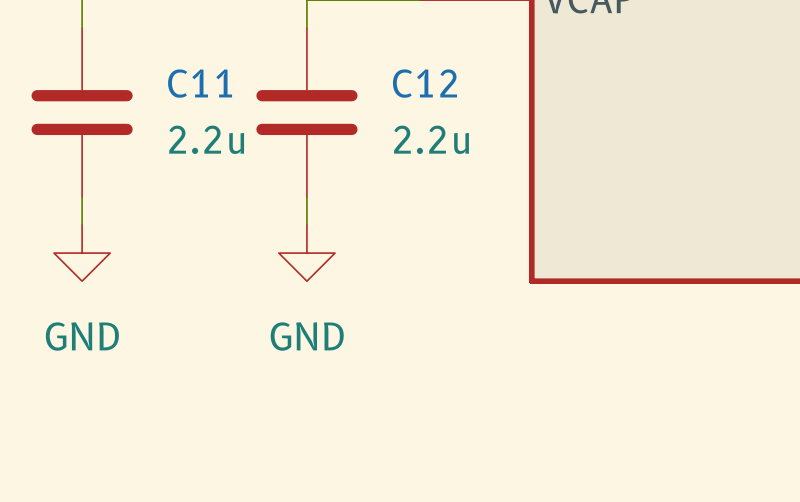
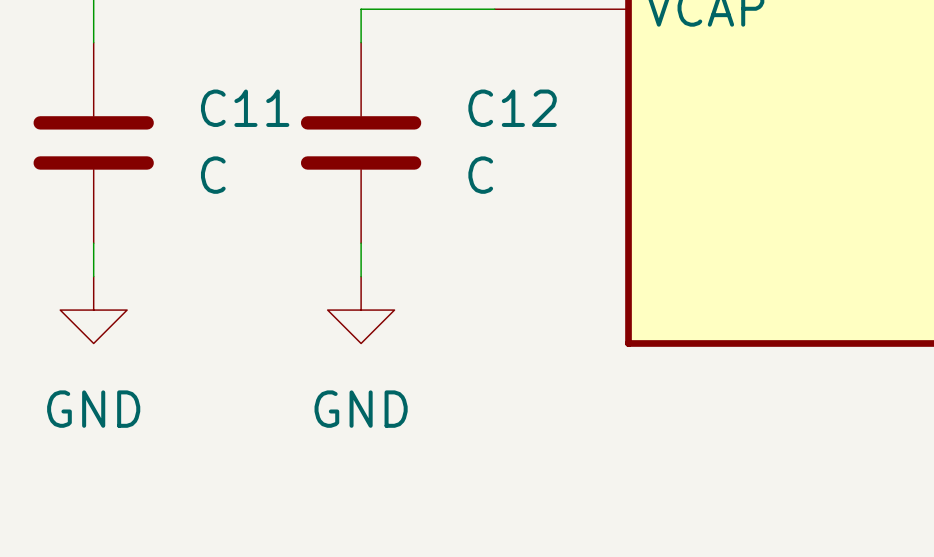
C11 value: 2.2u (206, 139) -> C (213, 175)
C12 value: 2.2u (431, 139) -> C (480, 175)

